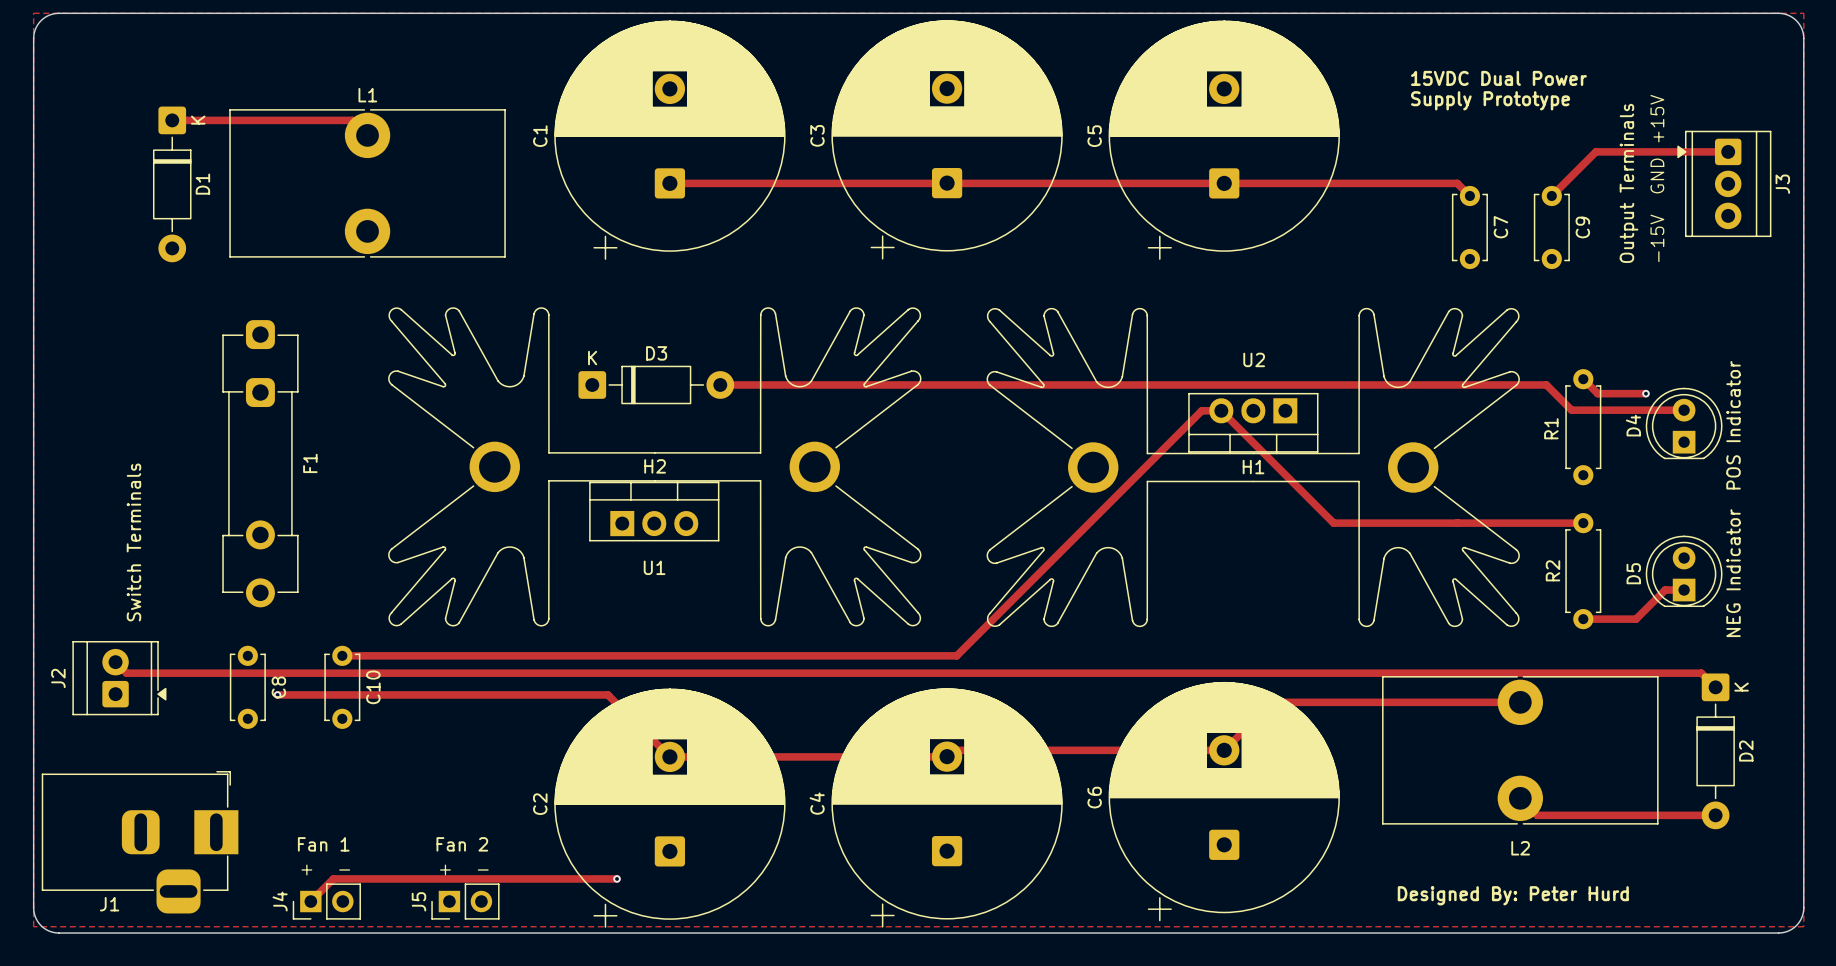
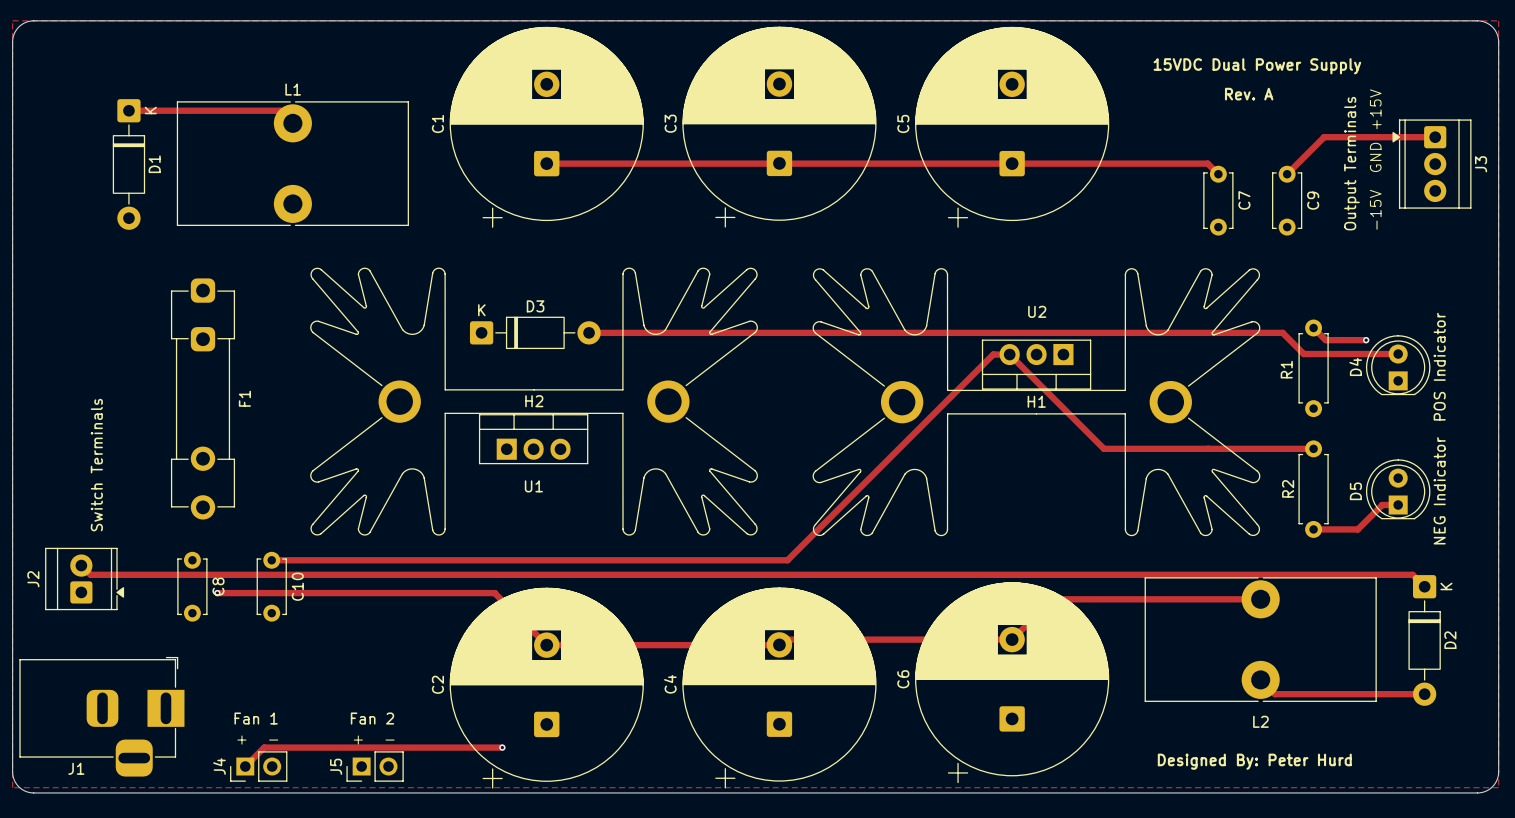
text: 15VDC Dual Power (1498, 78) -> 15VDC Dual Power Supply (1257, 66)
text: Supply Prototype (1490, 100) -> none
text: none -> Rev. A (1249, 94)

